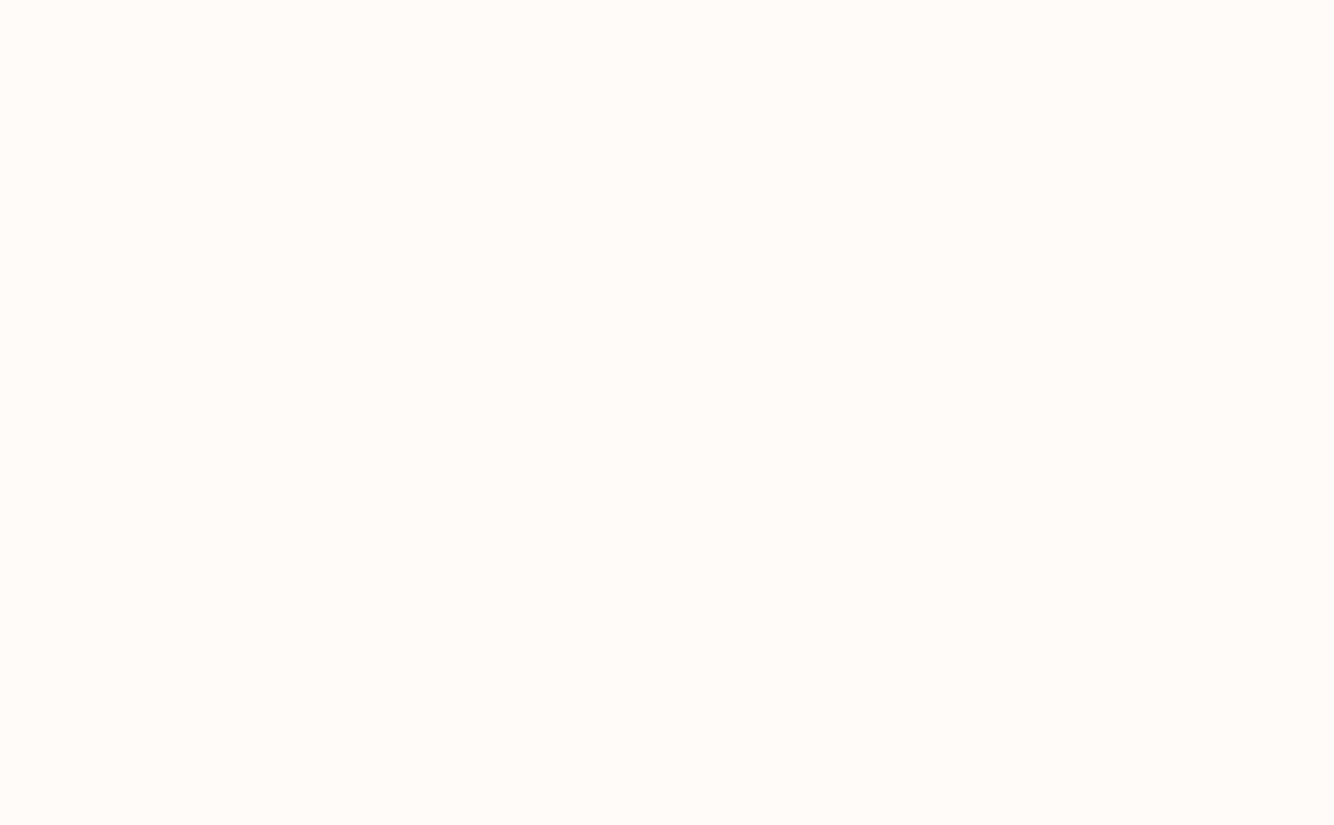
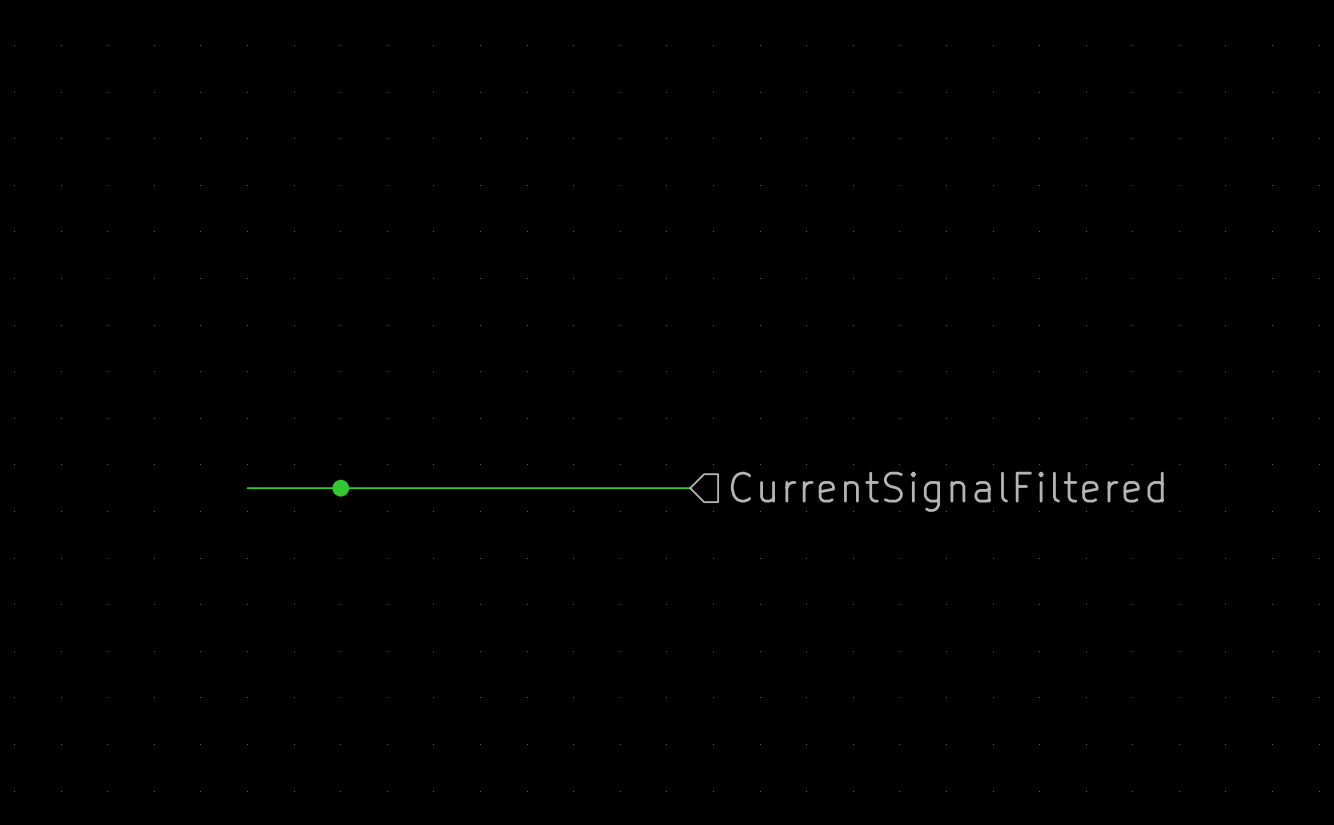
wire: none -> (247, 488) (690, 488)
junction: none -> (340, 488)
hierarchical label: none -> CurrentSignalFiltered (947, 491)

